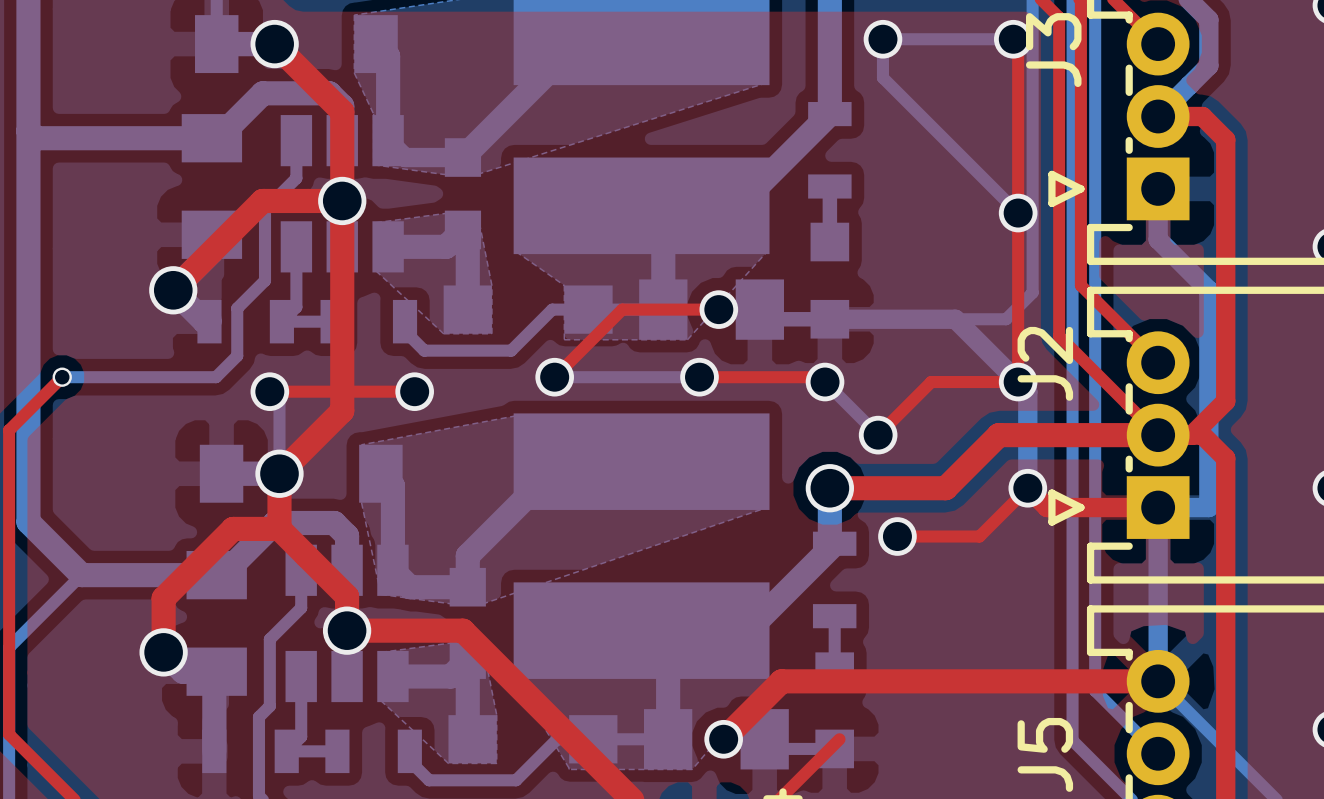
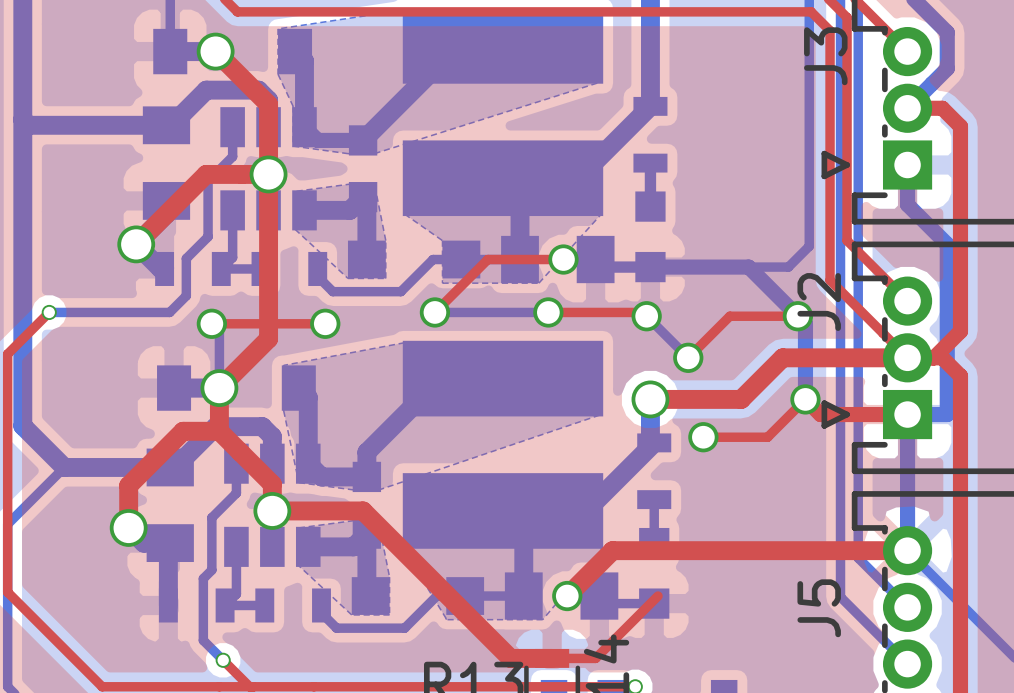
via: (882, 39) -> none
top track: (1013, 39) (1018, 44) (1018, 382) -> none
bottom track: (1013, 39) (882, 39) (882, 77) (1018, 213) -> none
via: (1013, 39) -> none
via: (1018, 213) -> none

